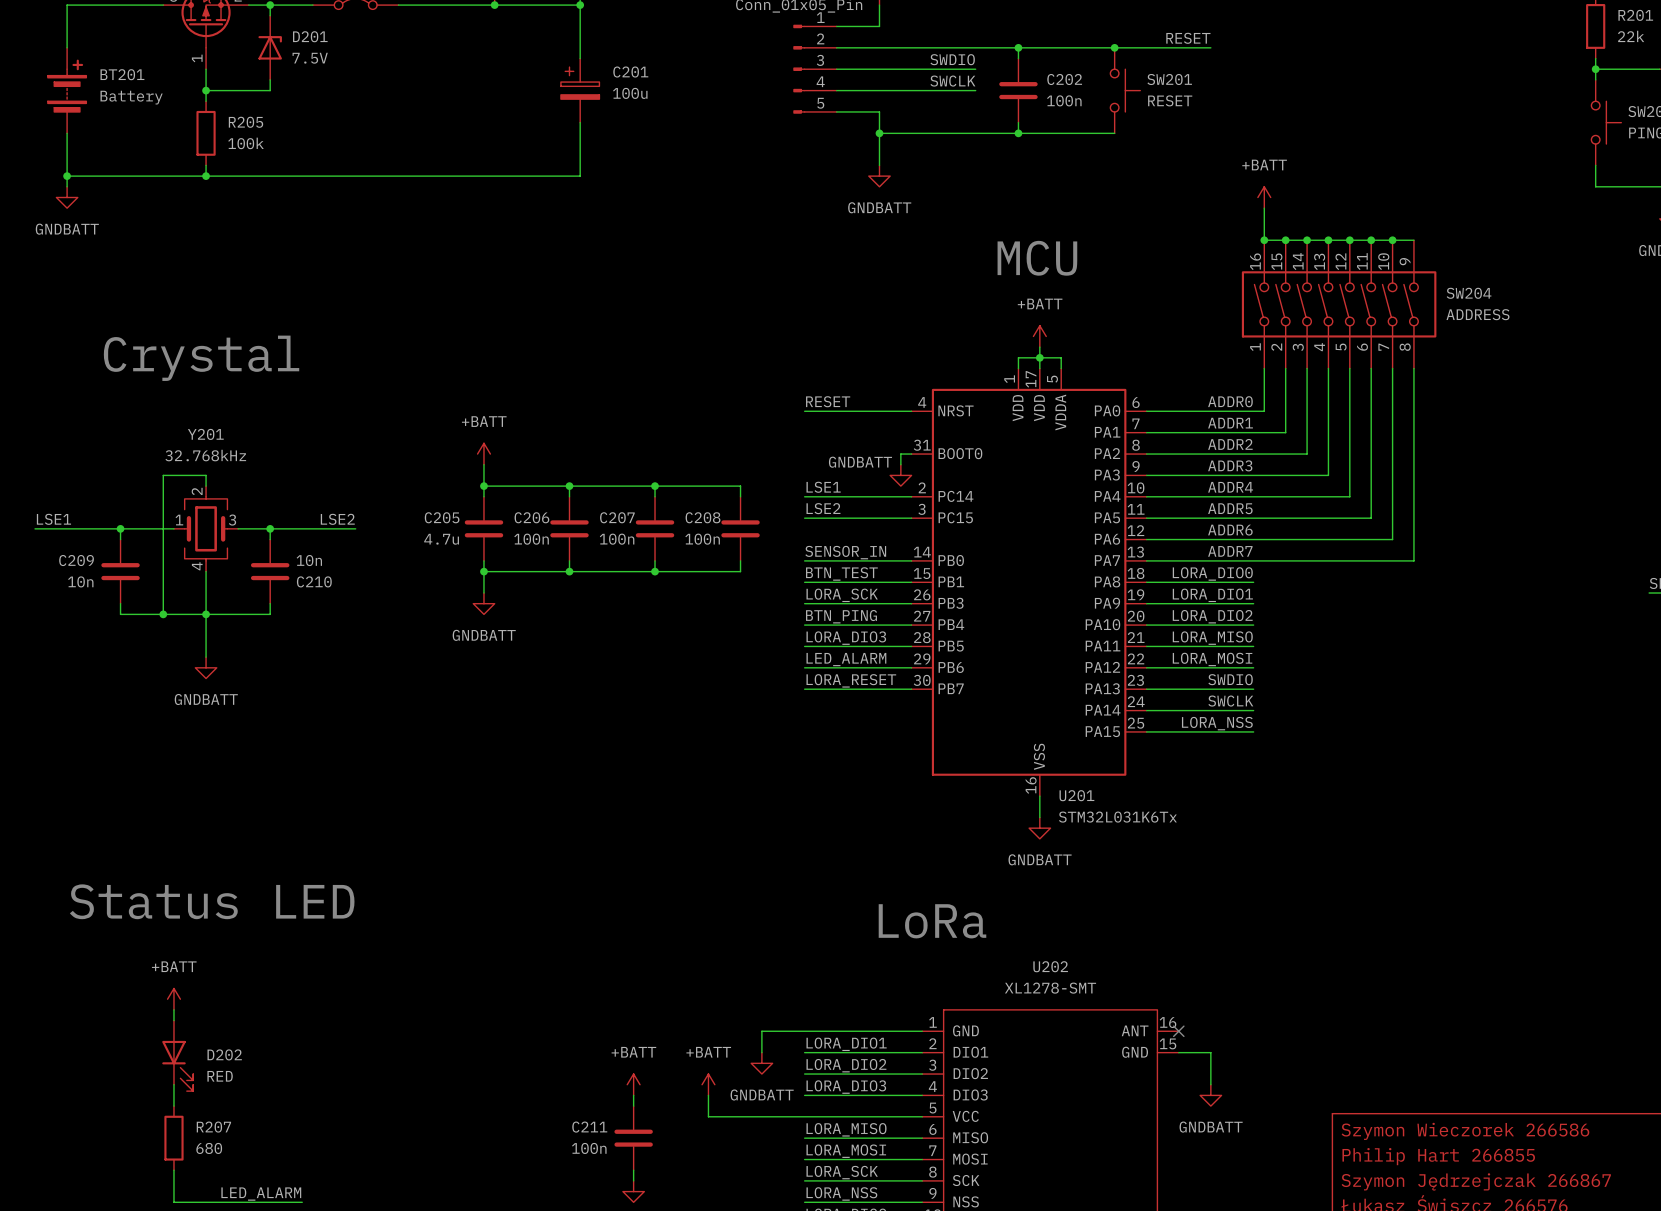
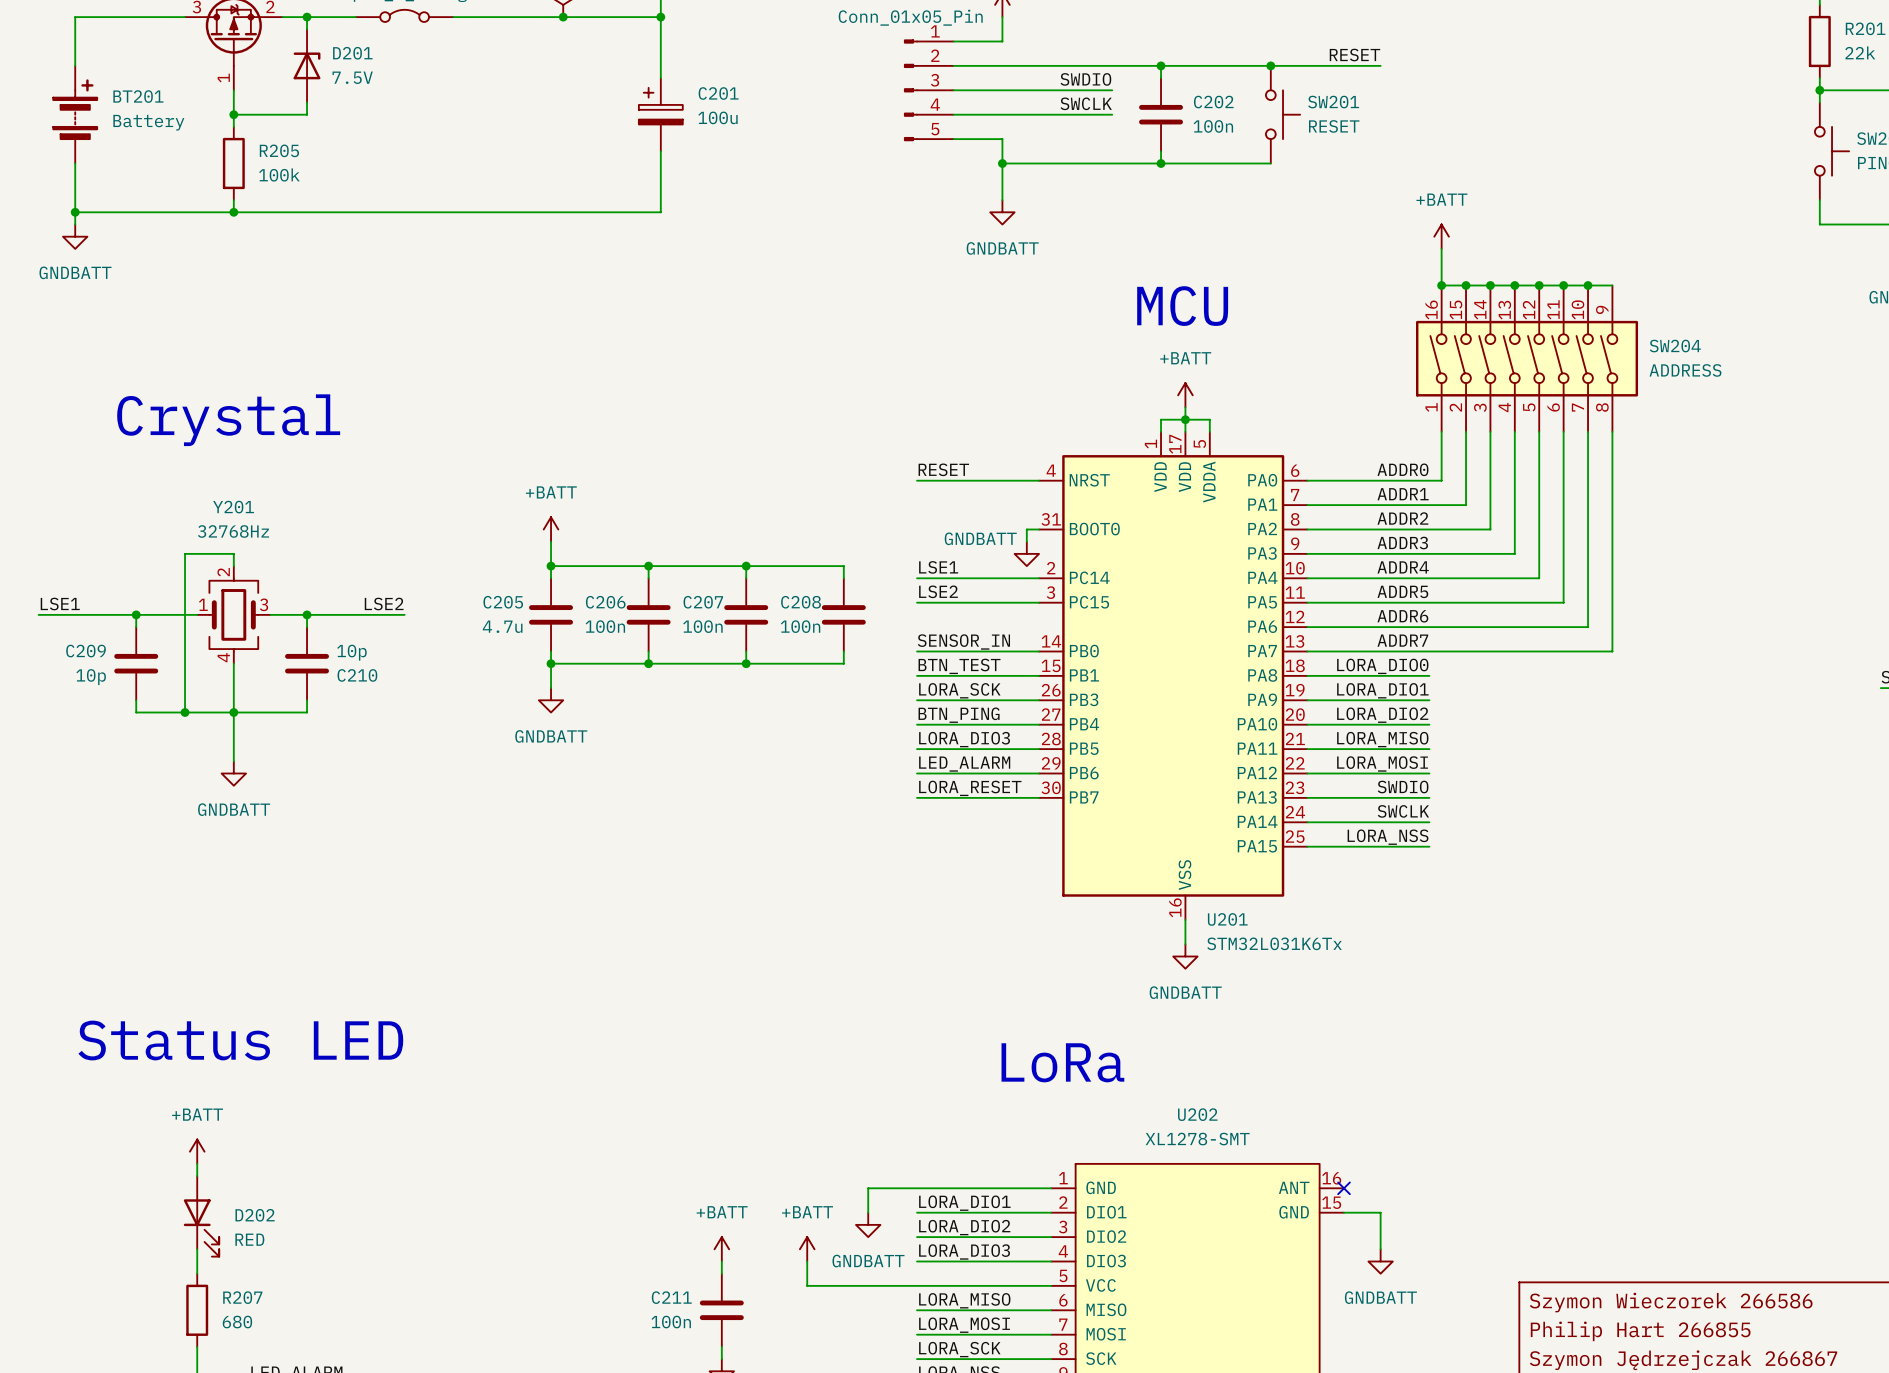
Y201 value: 32.768kHz (205, 455) -> 32768Hz (233, 531)
C210 value: 10n (309, 560) -> 10p (351, 652)
C209 value: 10n (80, 581) -> 10p (91, 677)

